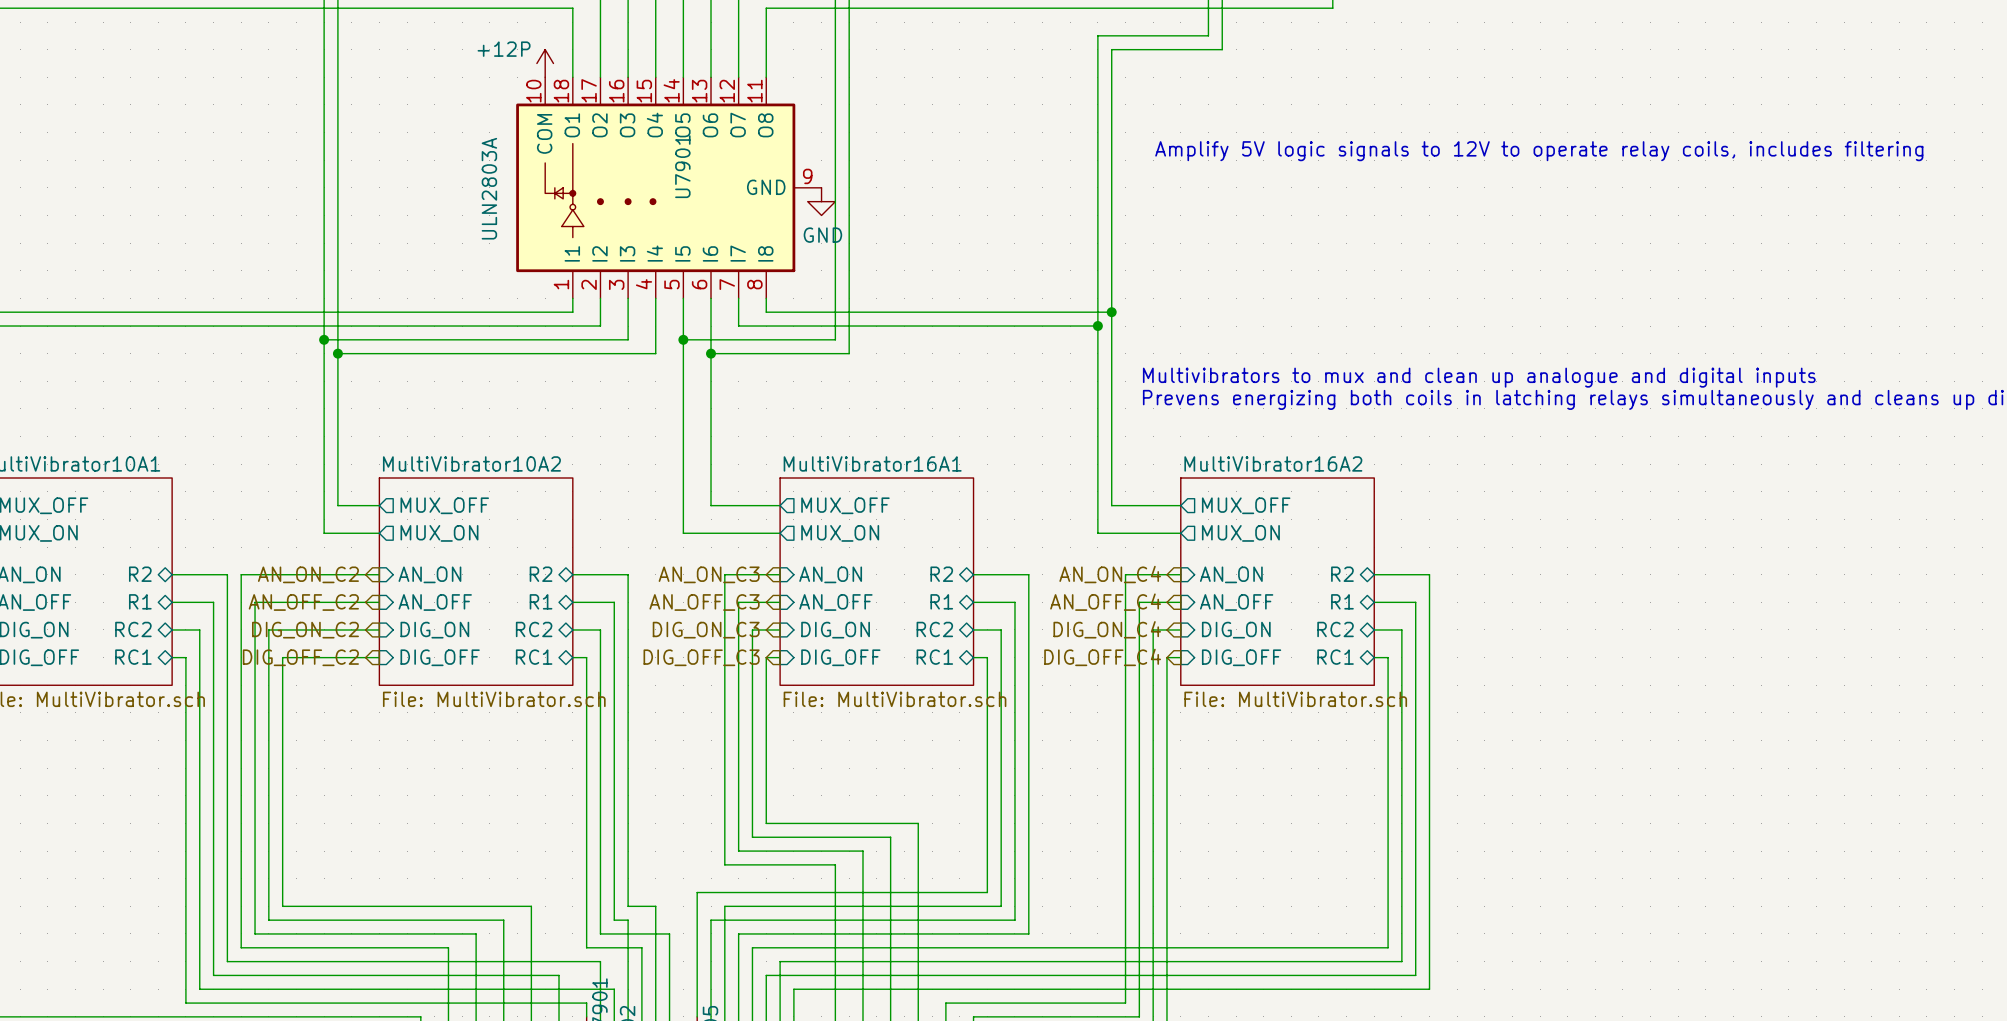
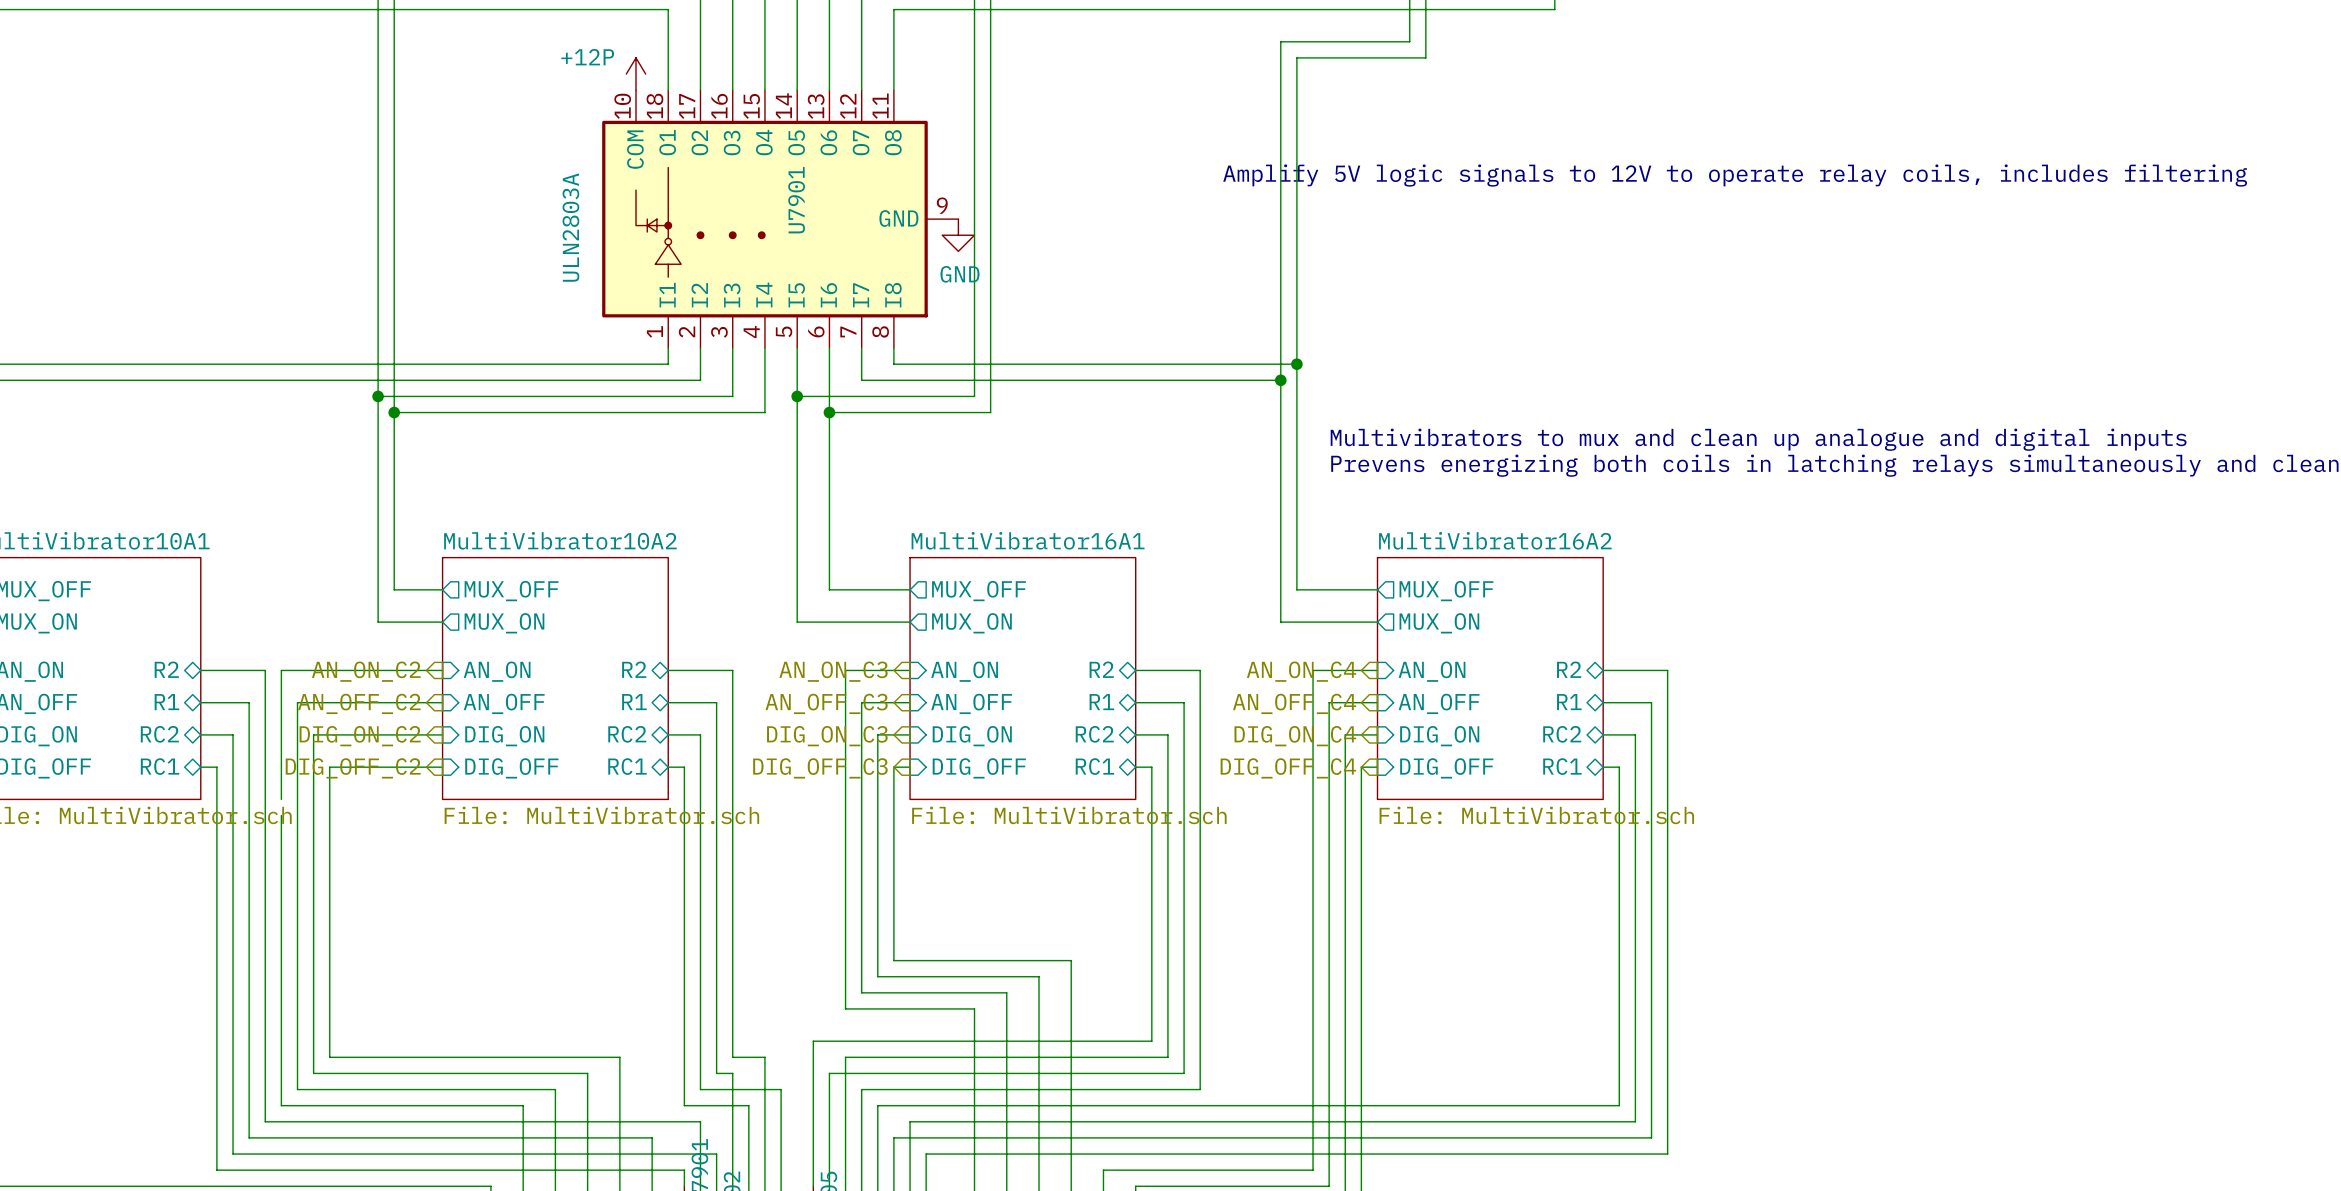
wire: (241, 685) (241, 699) -> none

